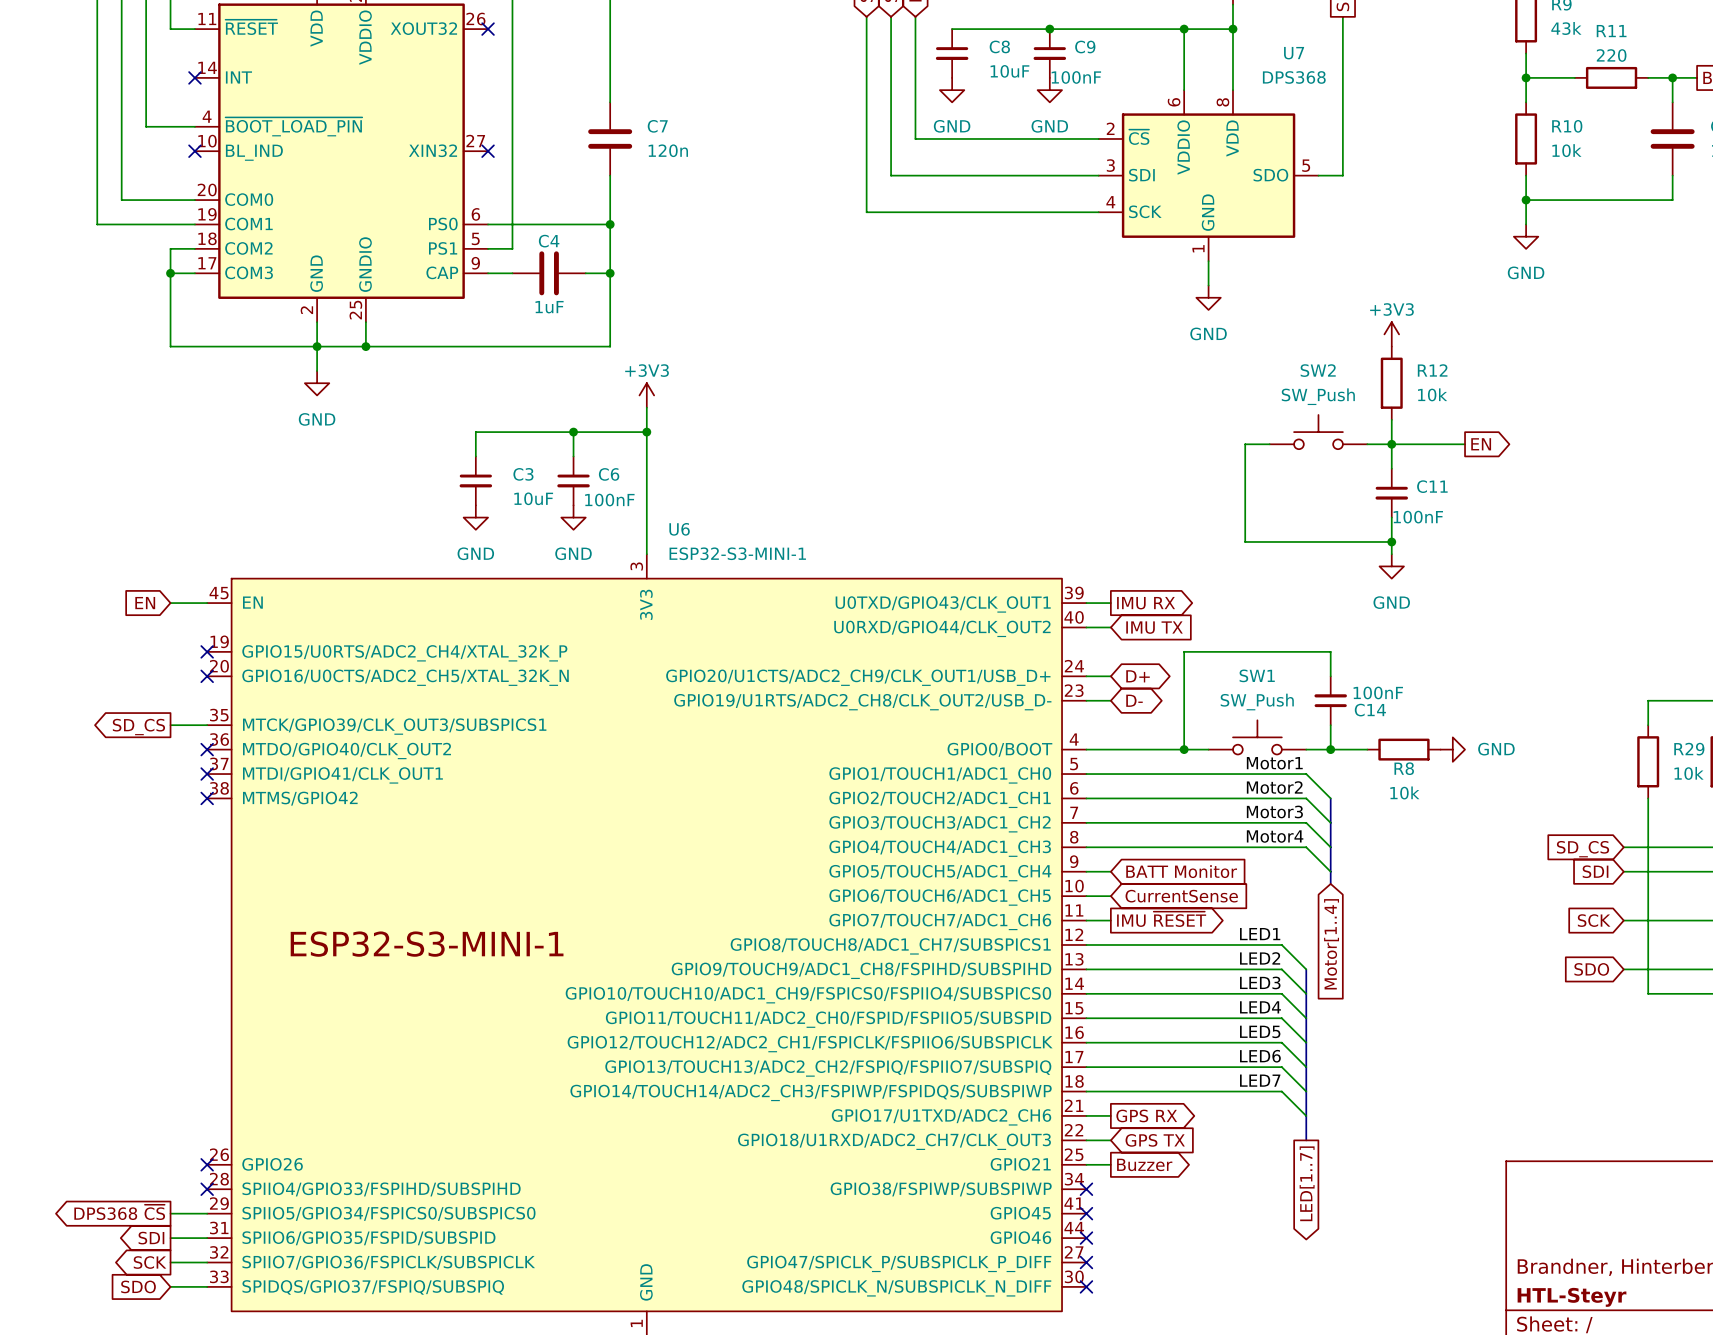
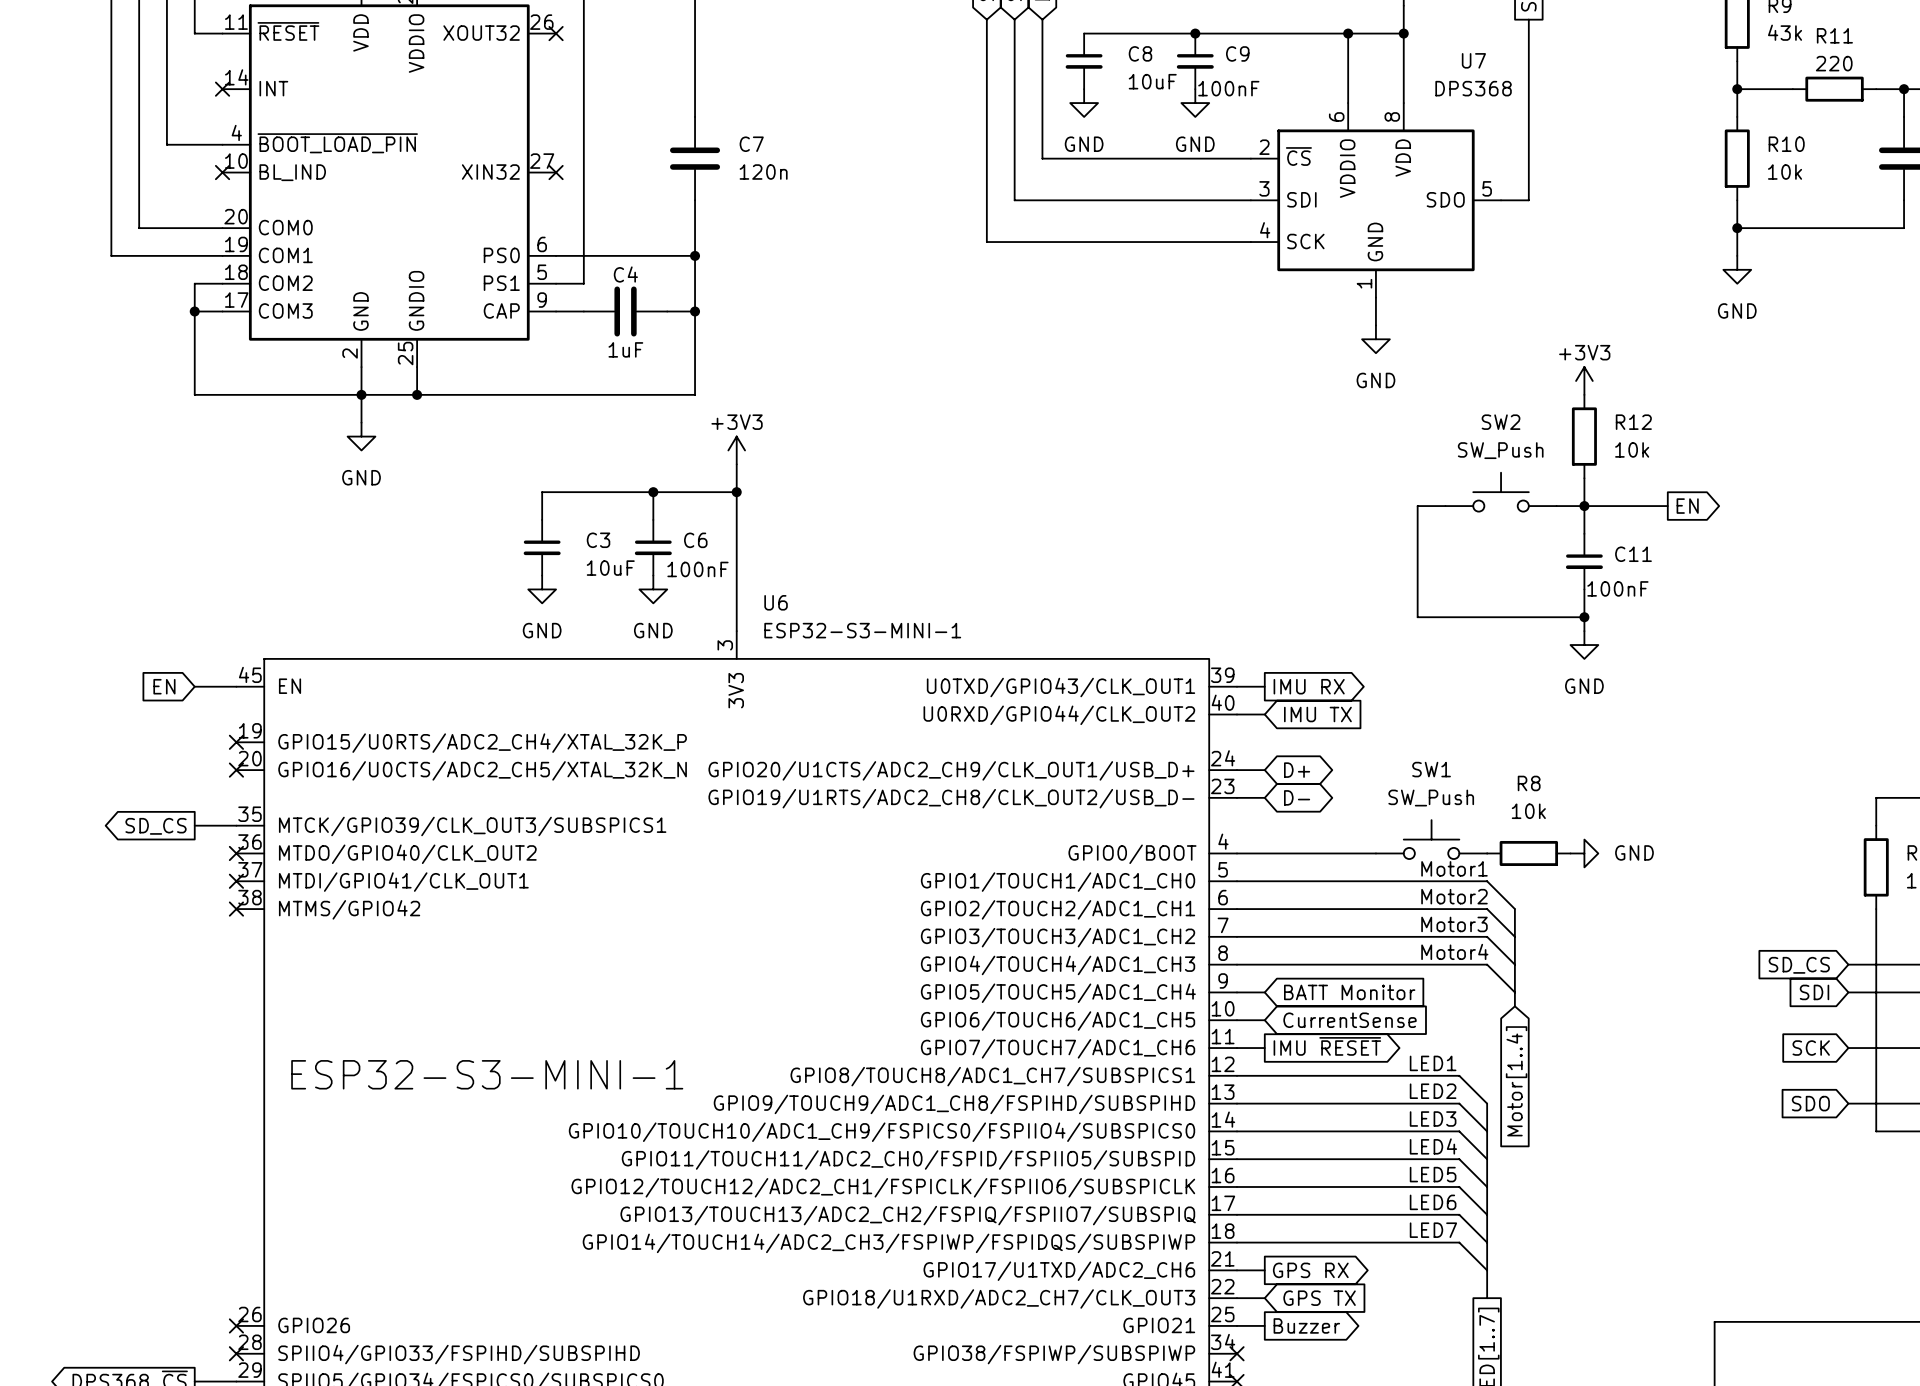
wire: (1330, 676) (1330, 651) (1184, 651) (1184, 749) -> none
C14: 100nF (1330, 700) -> none
wire: (1330, 725) (1330, 749) -> none
junction: (1184, 749) -> none
wire: (1306, 749) (1367, 749) -> none
junction: (1330, 749) -> none
R8 position: (1403, 749) -> (1528, 853)
power symbol position: GND (1452, 749) -> GND (1584, 853)
R8 name position: R8 (1404, 768) -> R8 (1529, 783)
R8 value position: 10k (1404, 792) -> 10k (1528, 811)

